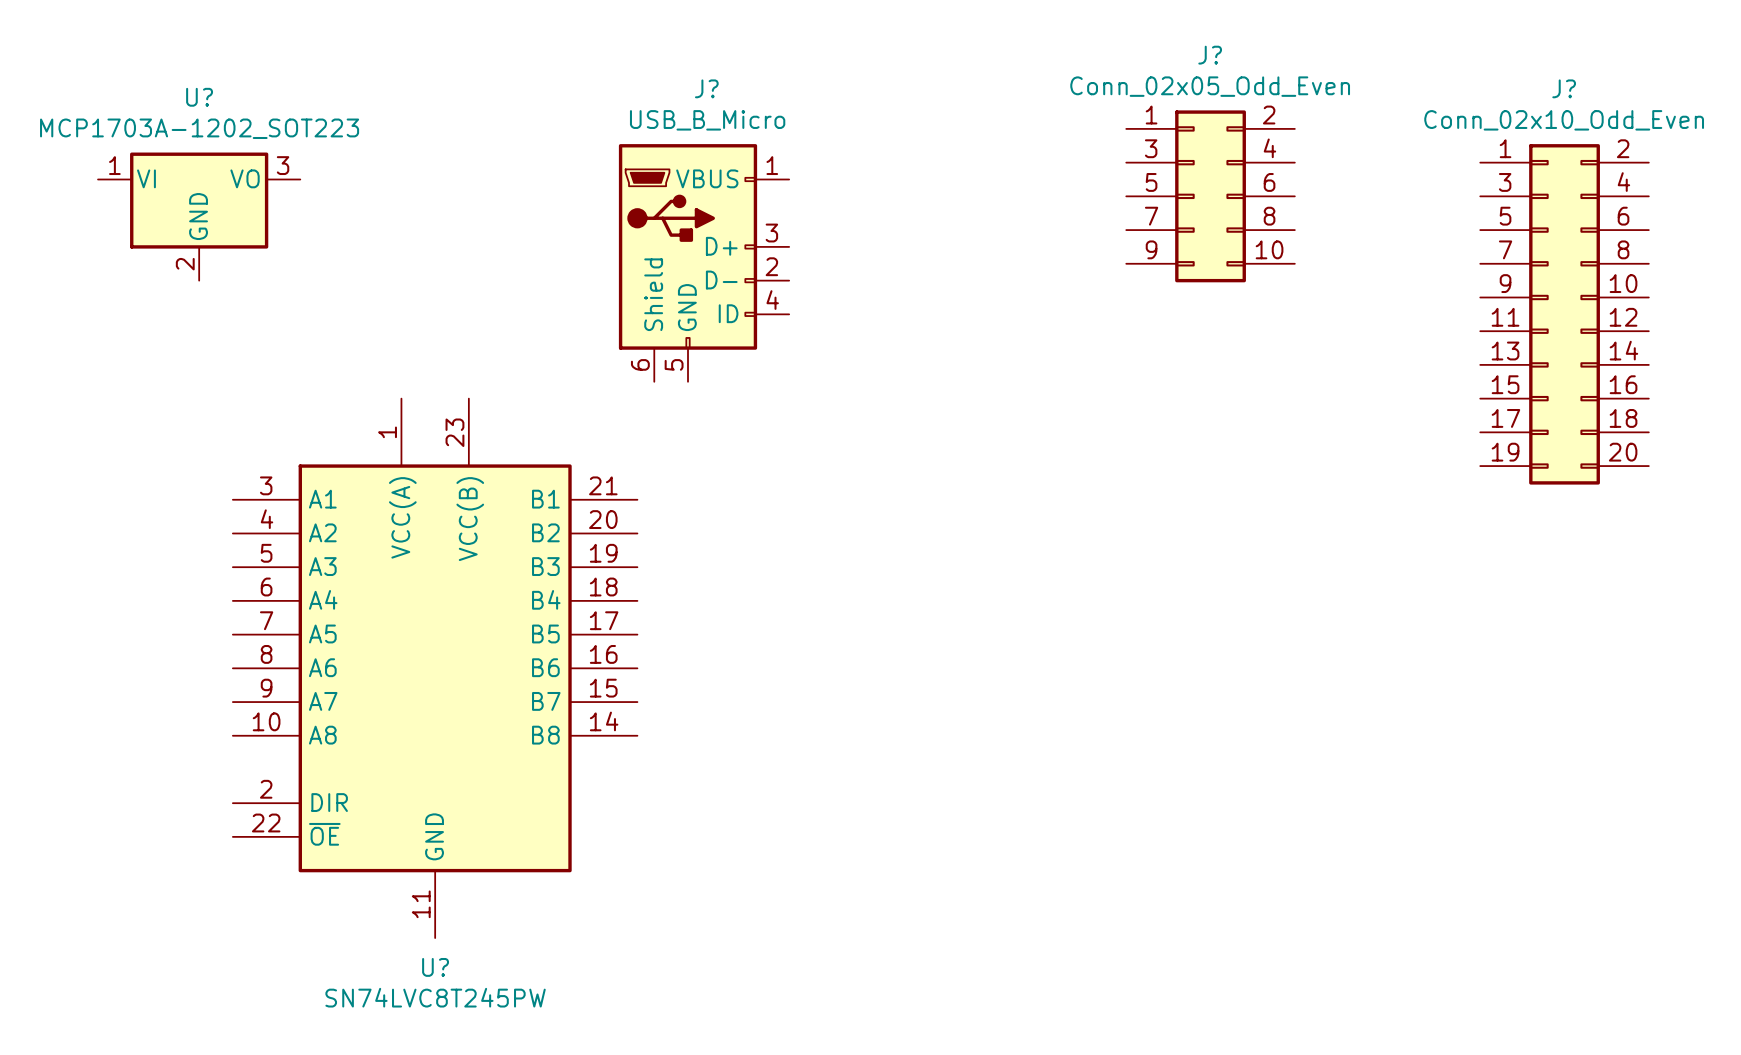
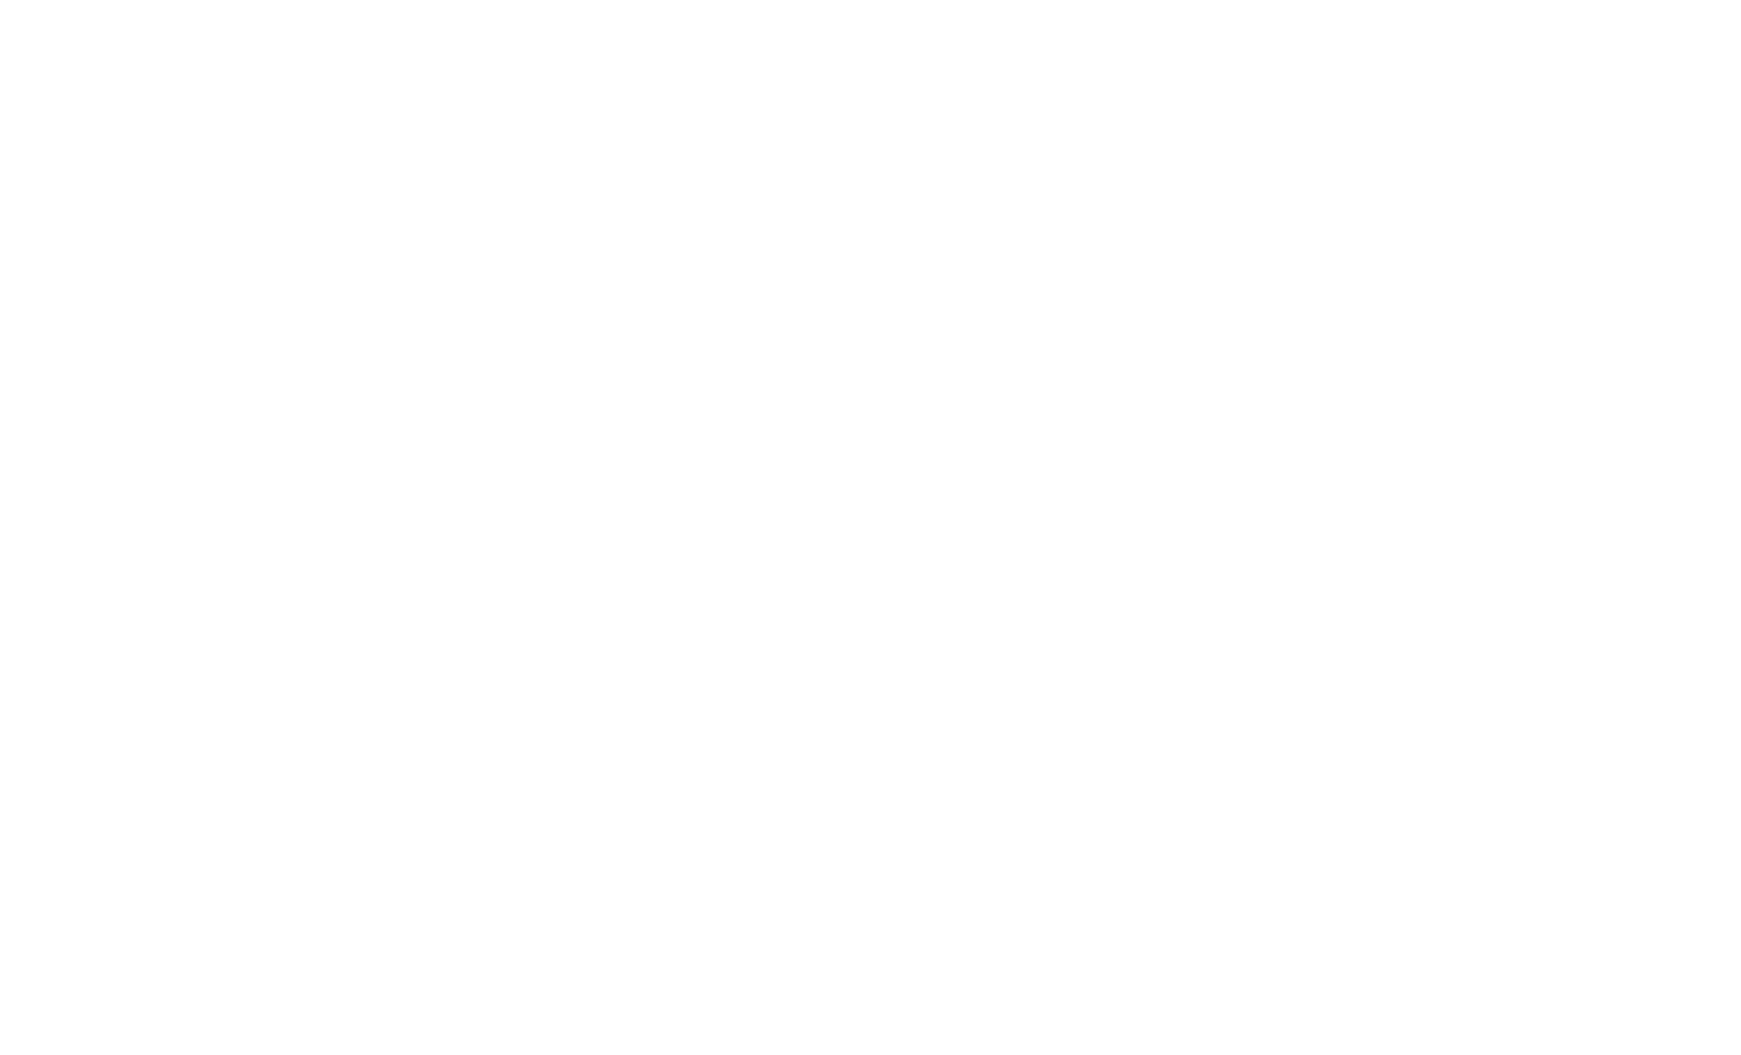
J?: Conn_02x05_Odd_Even (1210, 196) -> none
U?: MCP1703A-1202_SOT223 (199, 216) -> none
J?: USB_B_Micro (704, 262) -> none
J?: Conn_02x10_Odd_Even (1564, 314) -> none
U?: SN74LVC8T245PW (435, 668) -> none

